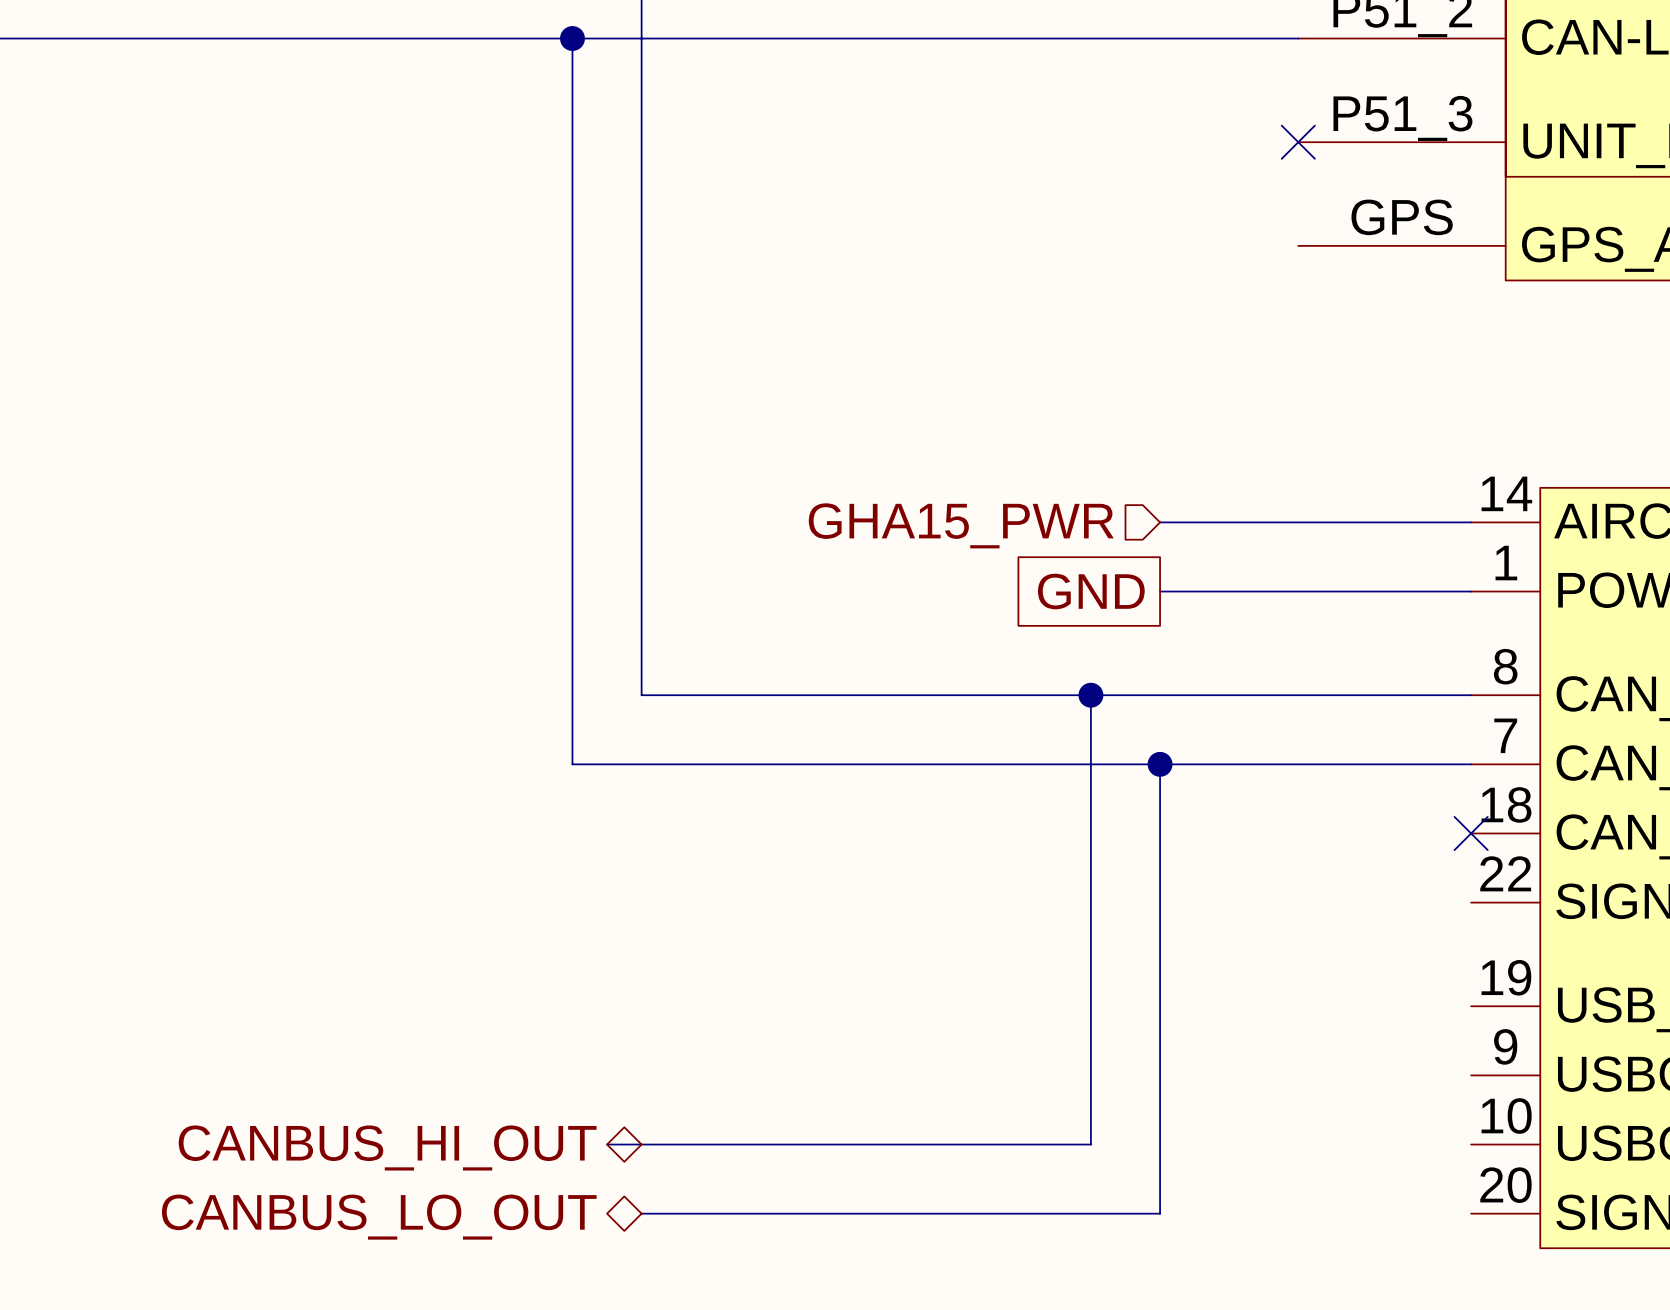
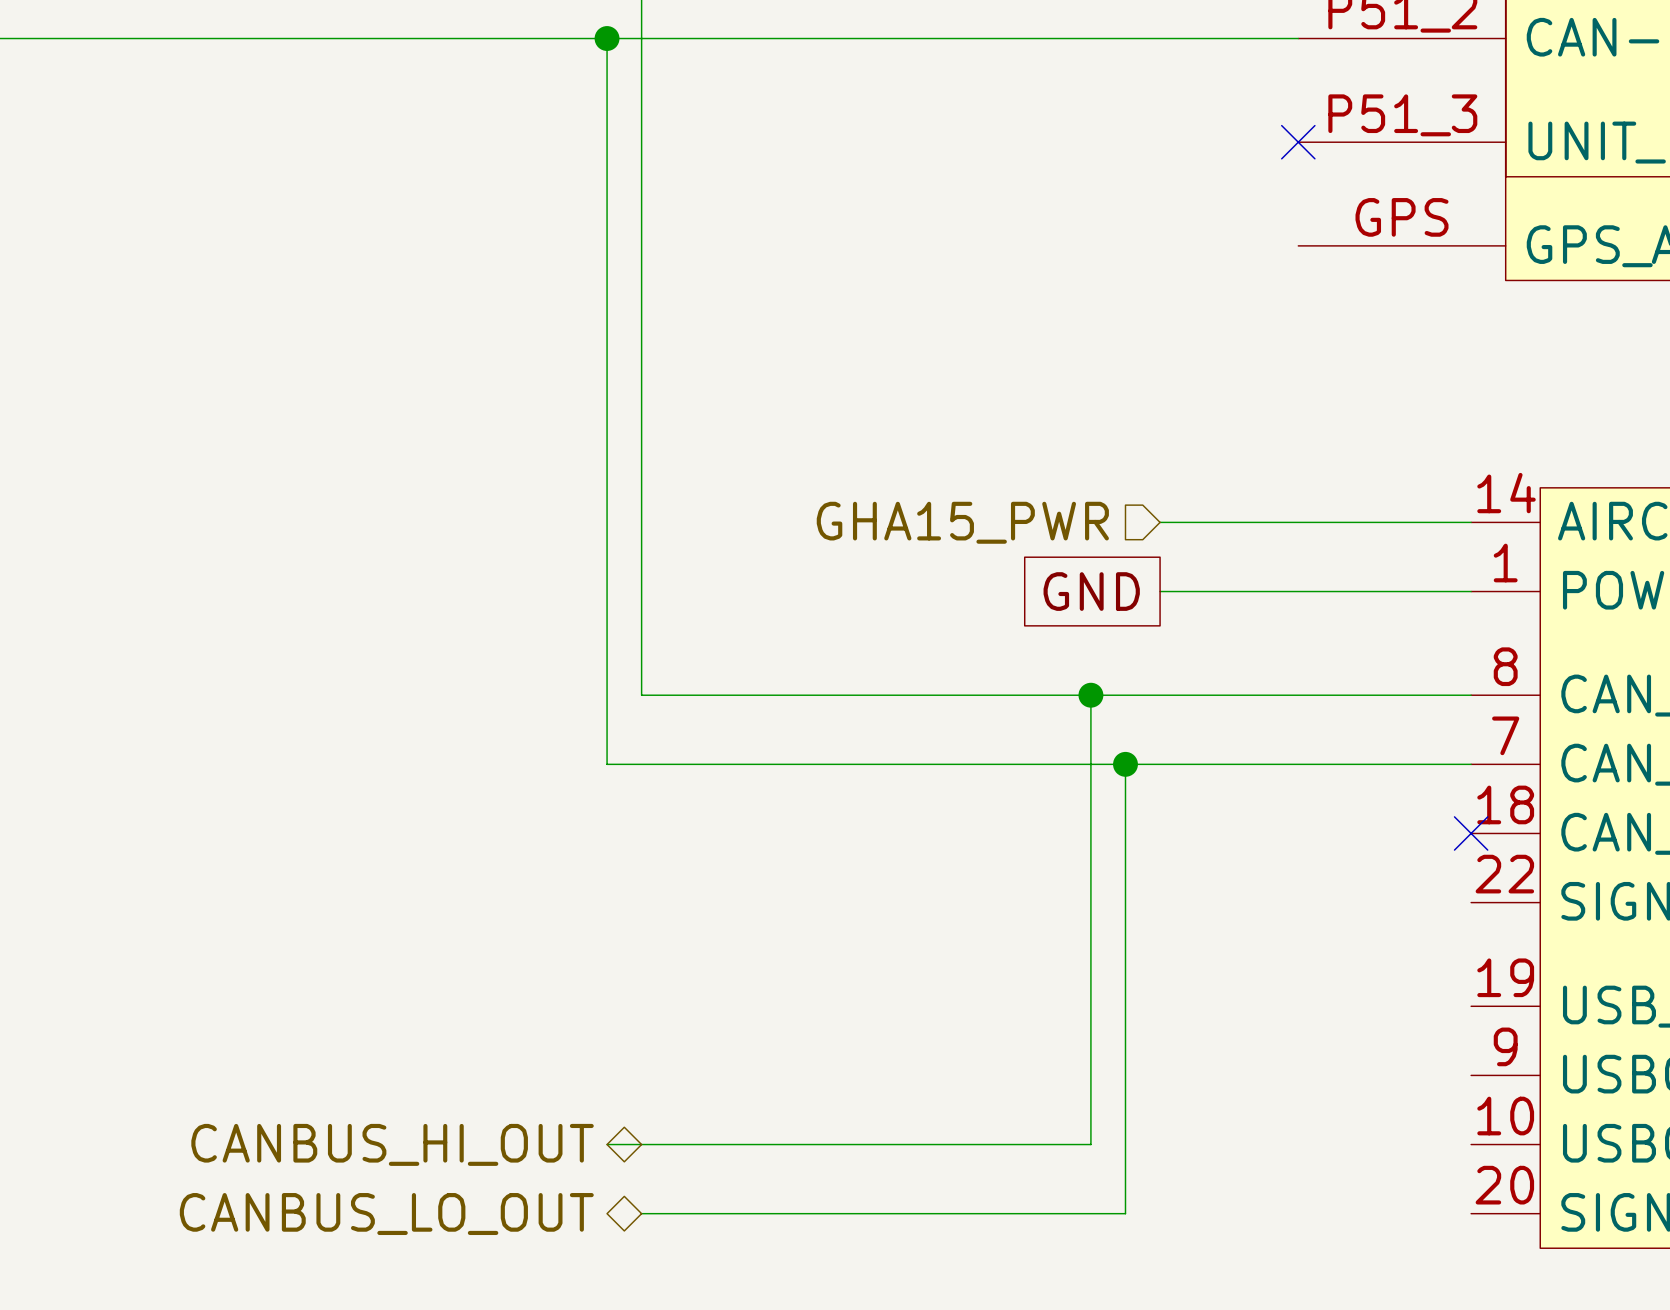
wire: (572, 38) (572, 764) (607, 764) -> (607, 38) (607, 764)
junction position: (572, 38) -> (607, 38)
wire: (1160, 764) (1160, 1213) (1125, 1213) -> (1125, 764) (1125, 1213)
junction position: (1160, 764) -> (1125, 764)

